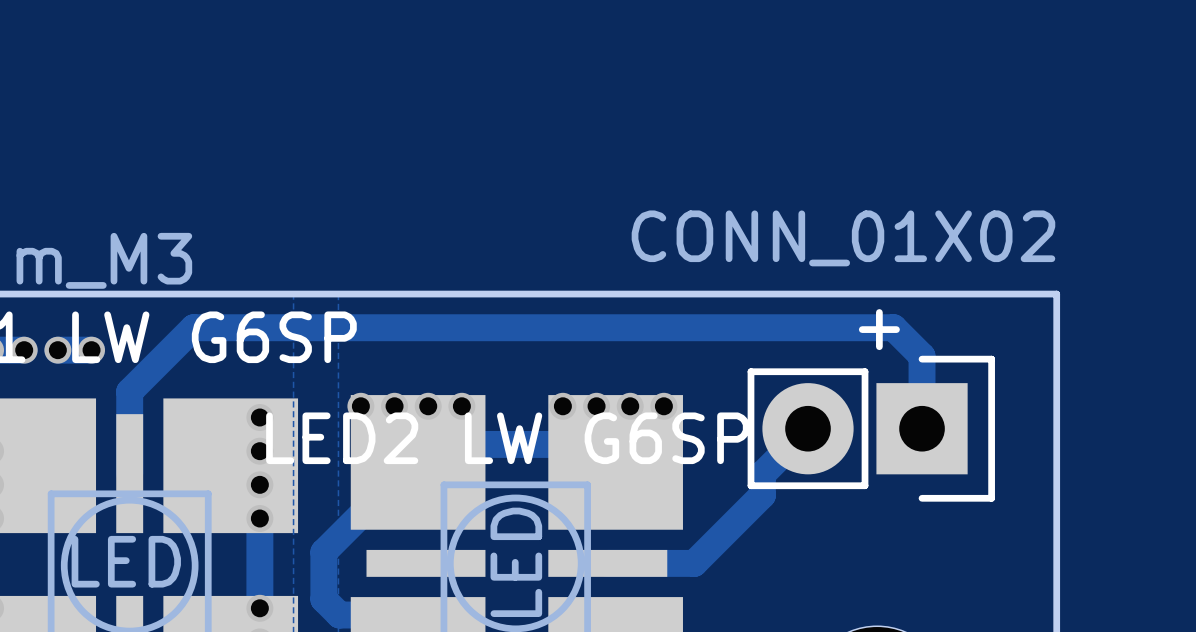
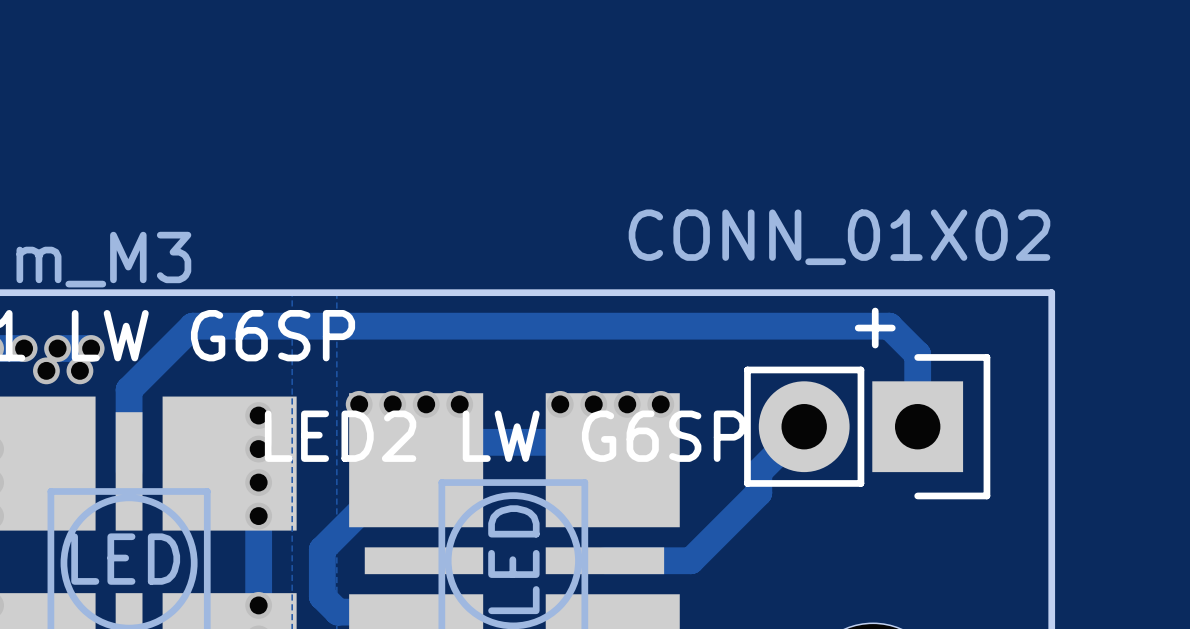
via: none -> (46, 370)
via: none -> (79, 370)

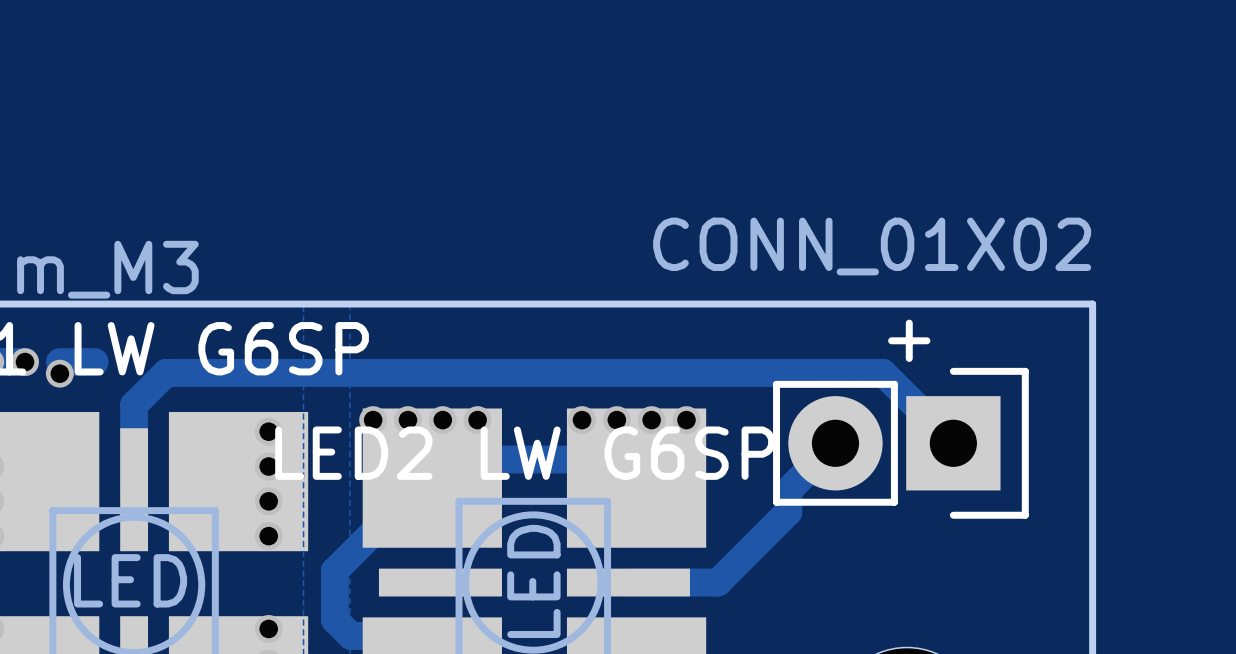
via: (57, 348) -> none
via: (91, 348) -> none
track: (159, 358) (192, 326) (889, 326) (917, 354) (917, 426) -> (166, 372) (883, 372) (953, 443)
via: none -> (59, 373)
via: (46, 370) -> none
via: (79, 370) -> none
track: (258, 516) (258, 605) -> none

